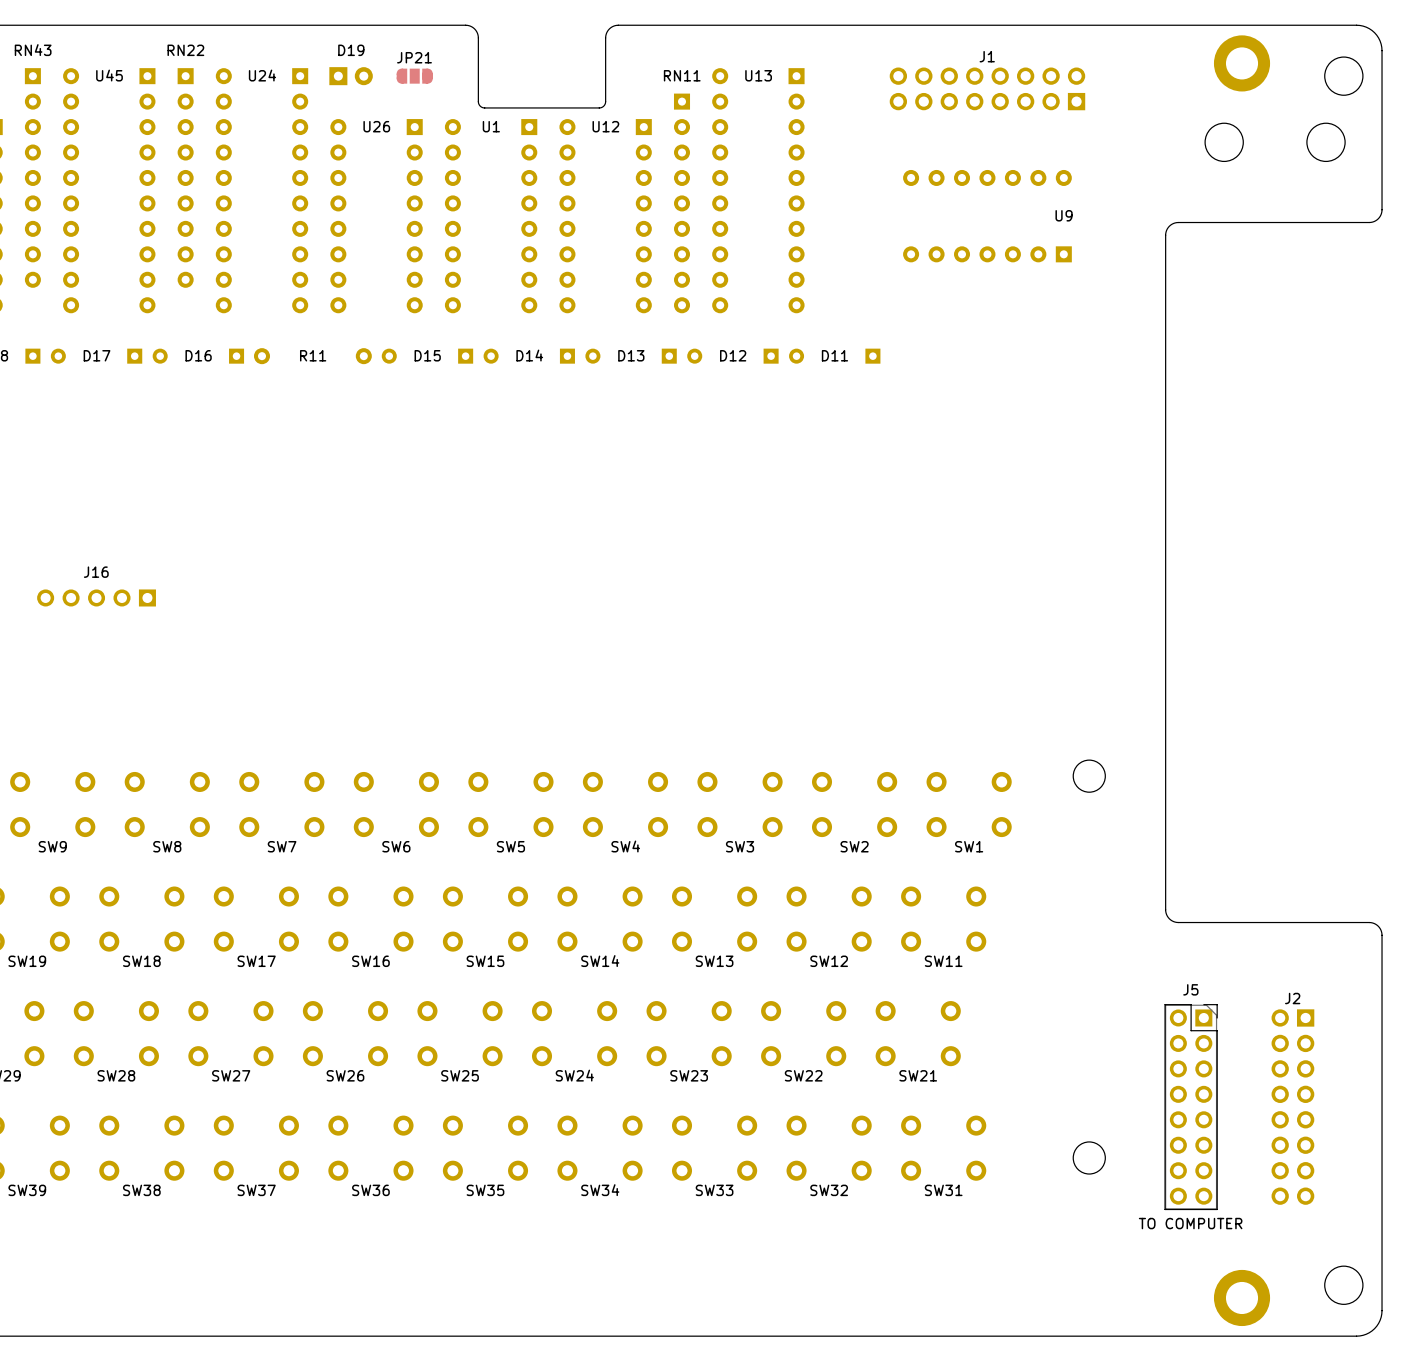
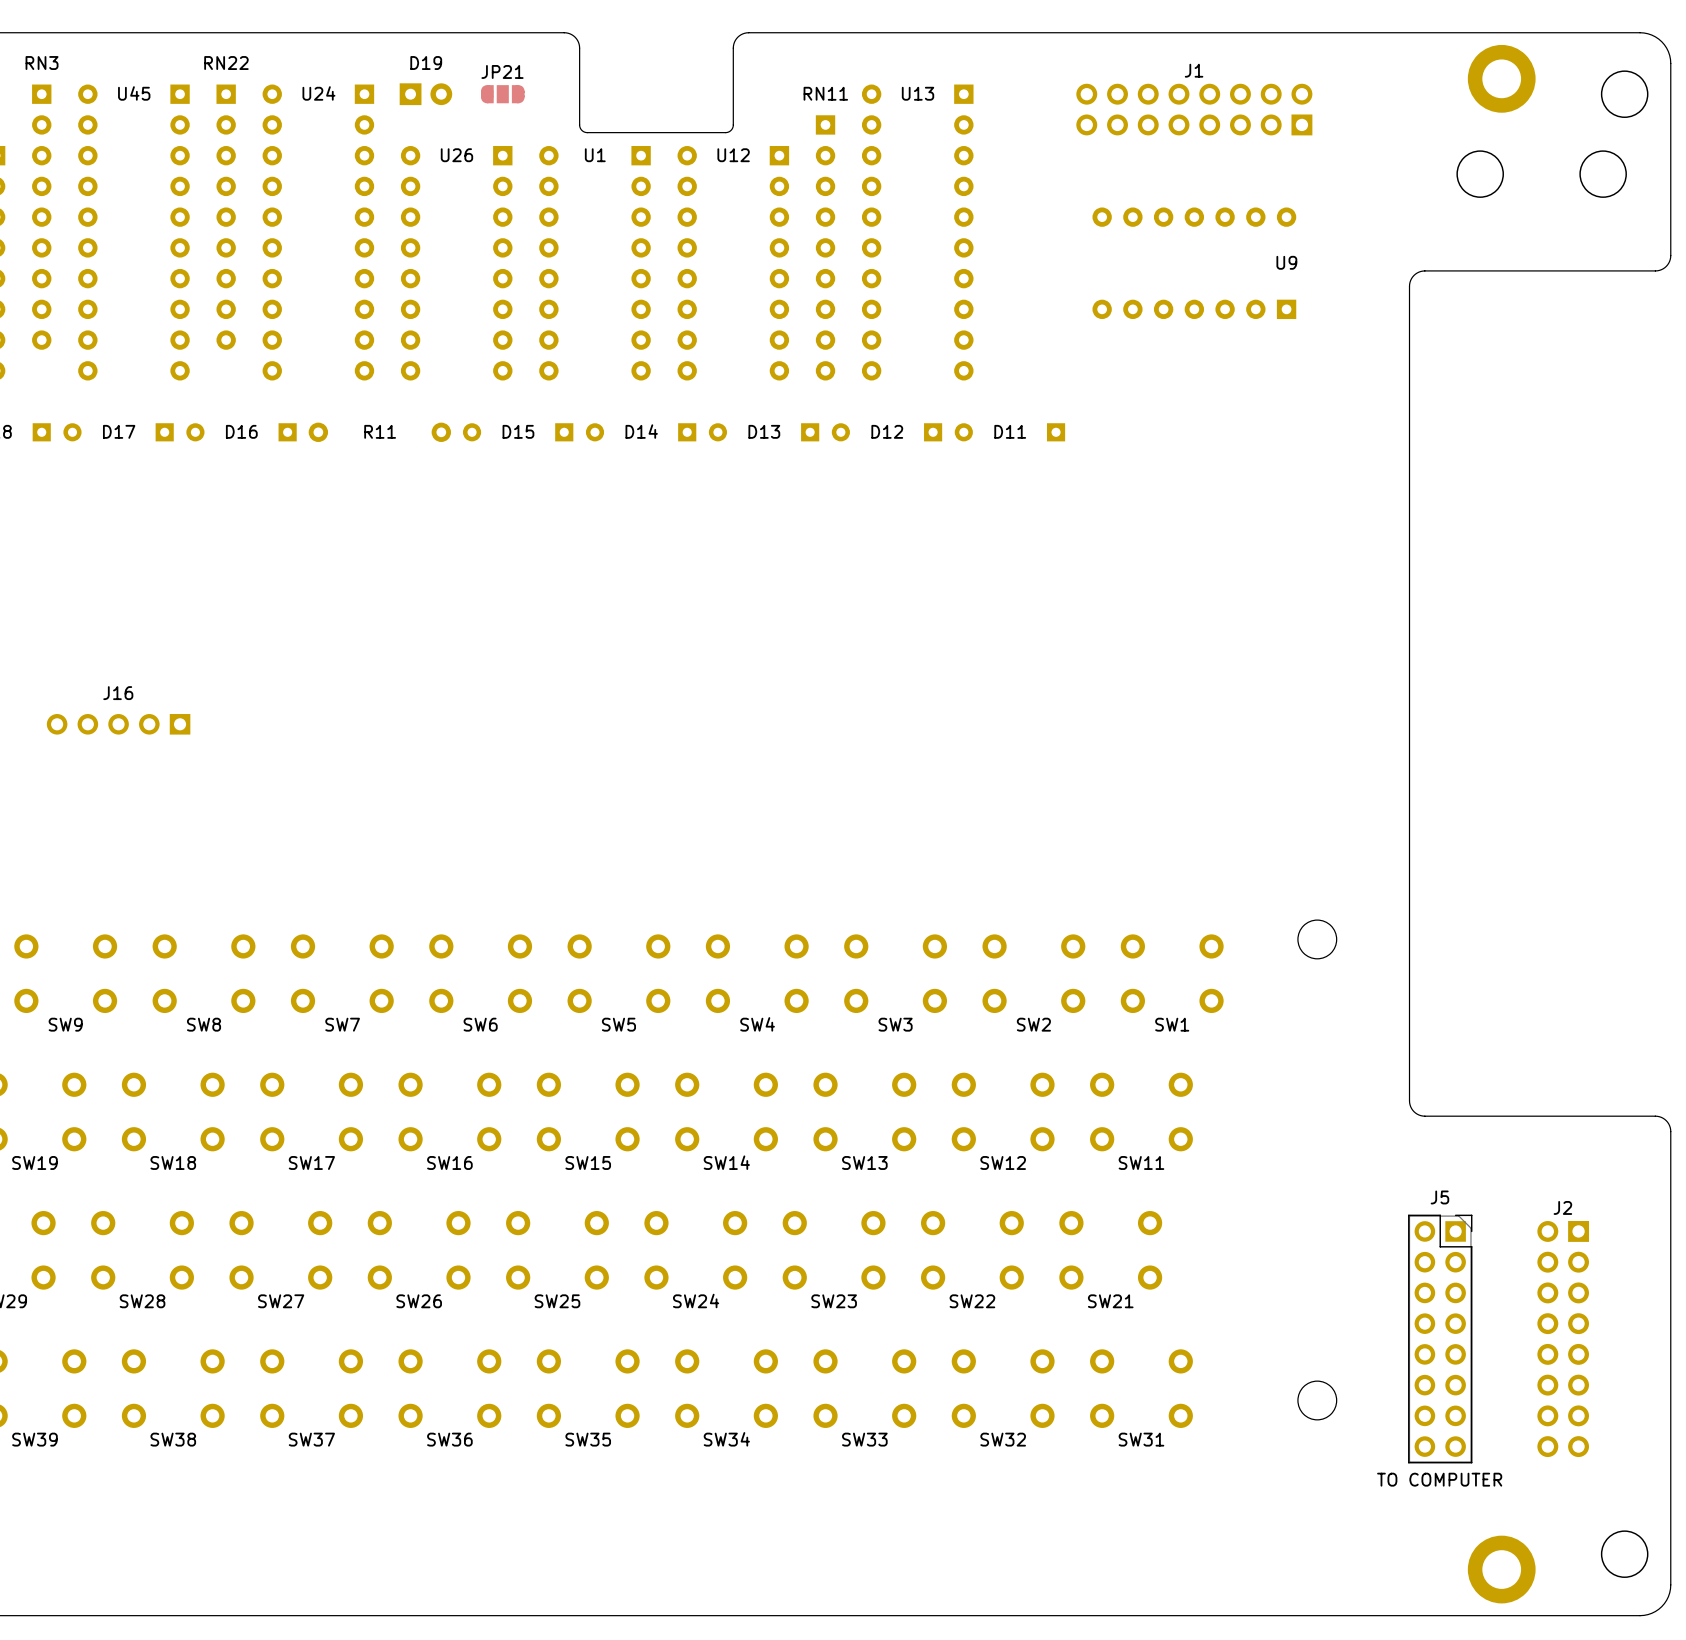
RN43 name: RN43 (33, 50) -> RN3 (42, 63)

